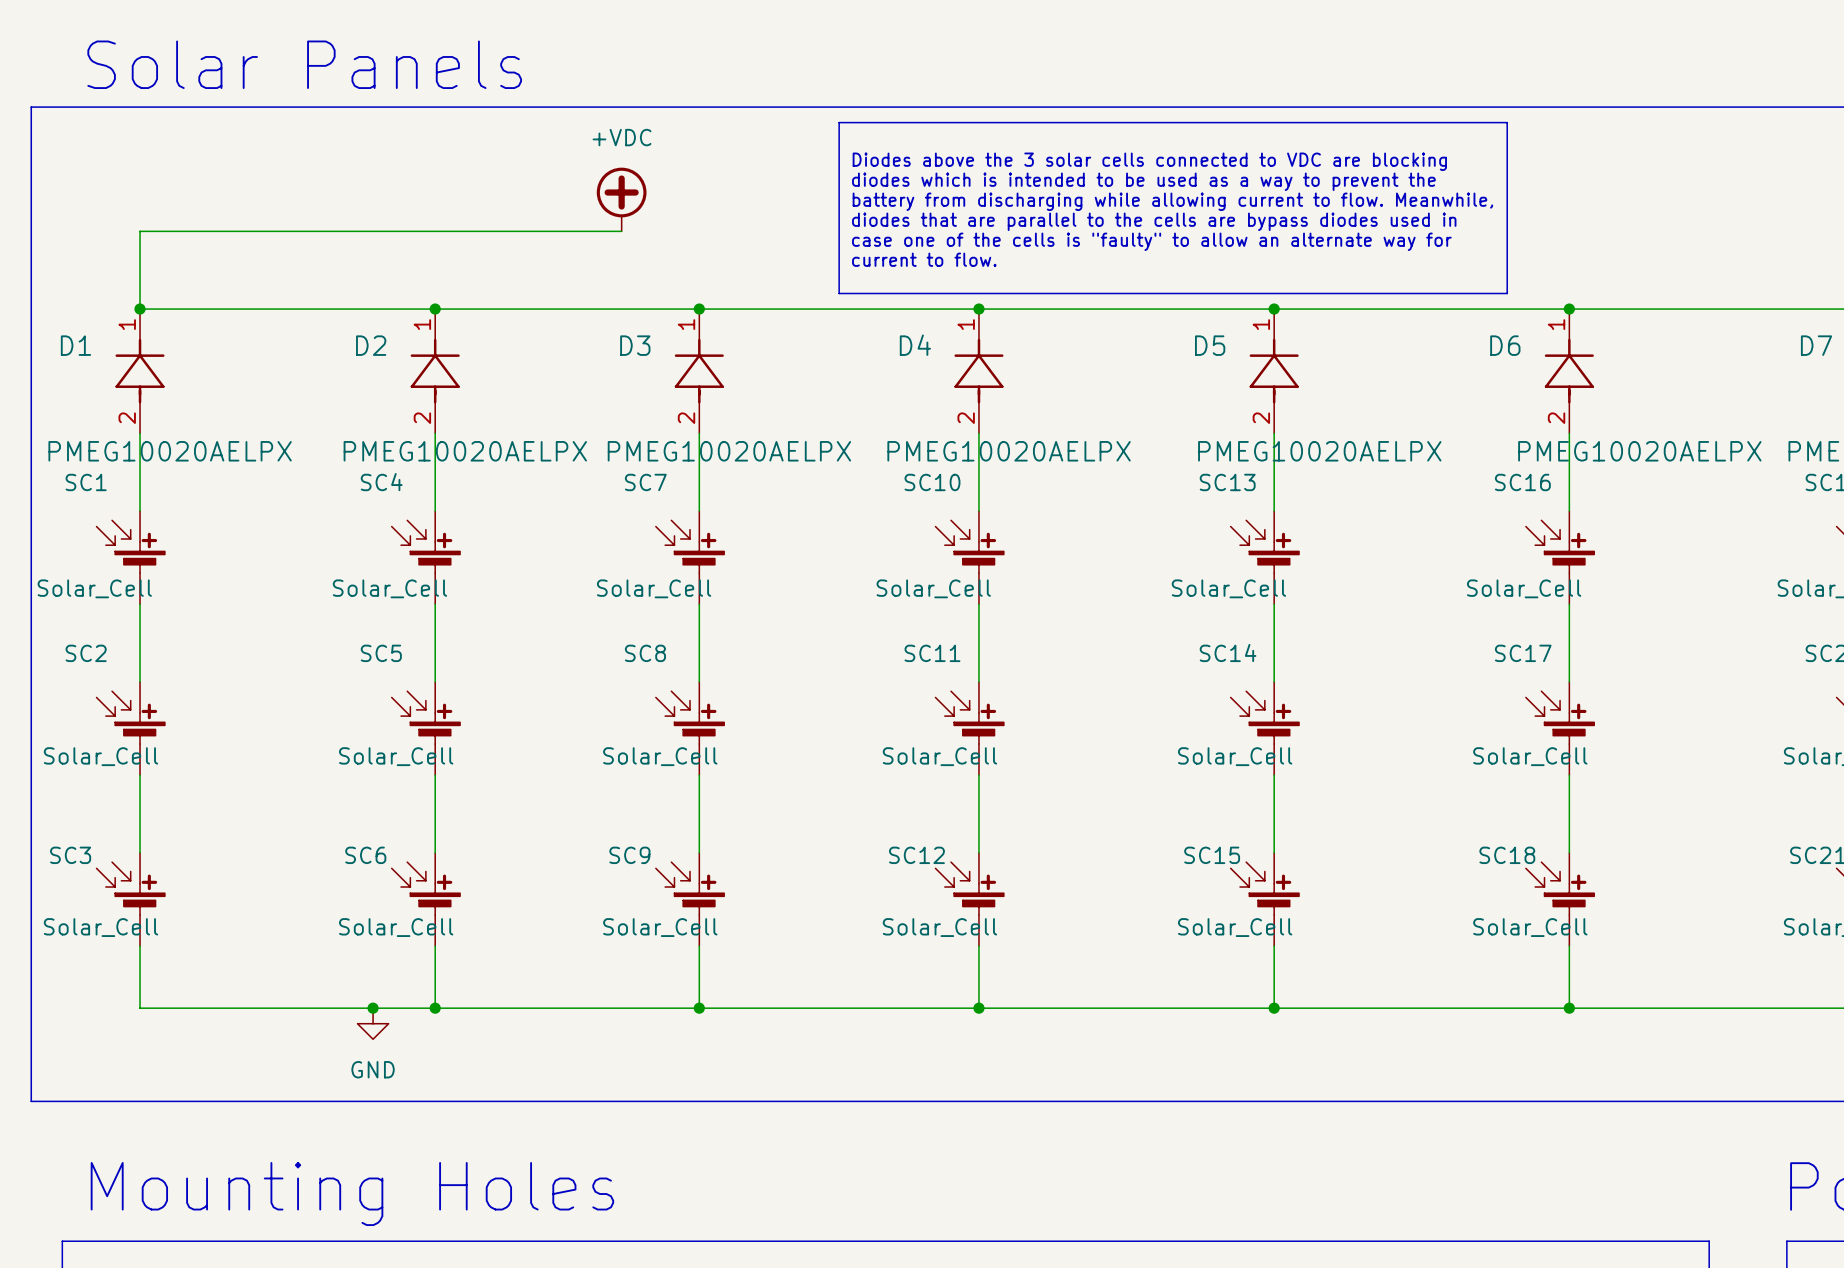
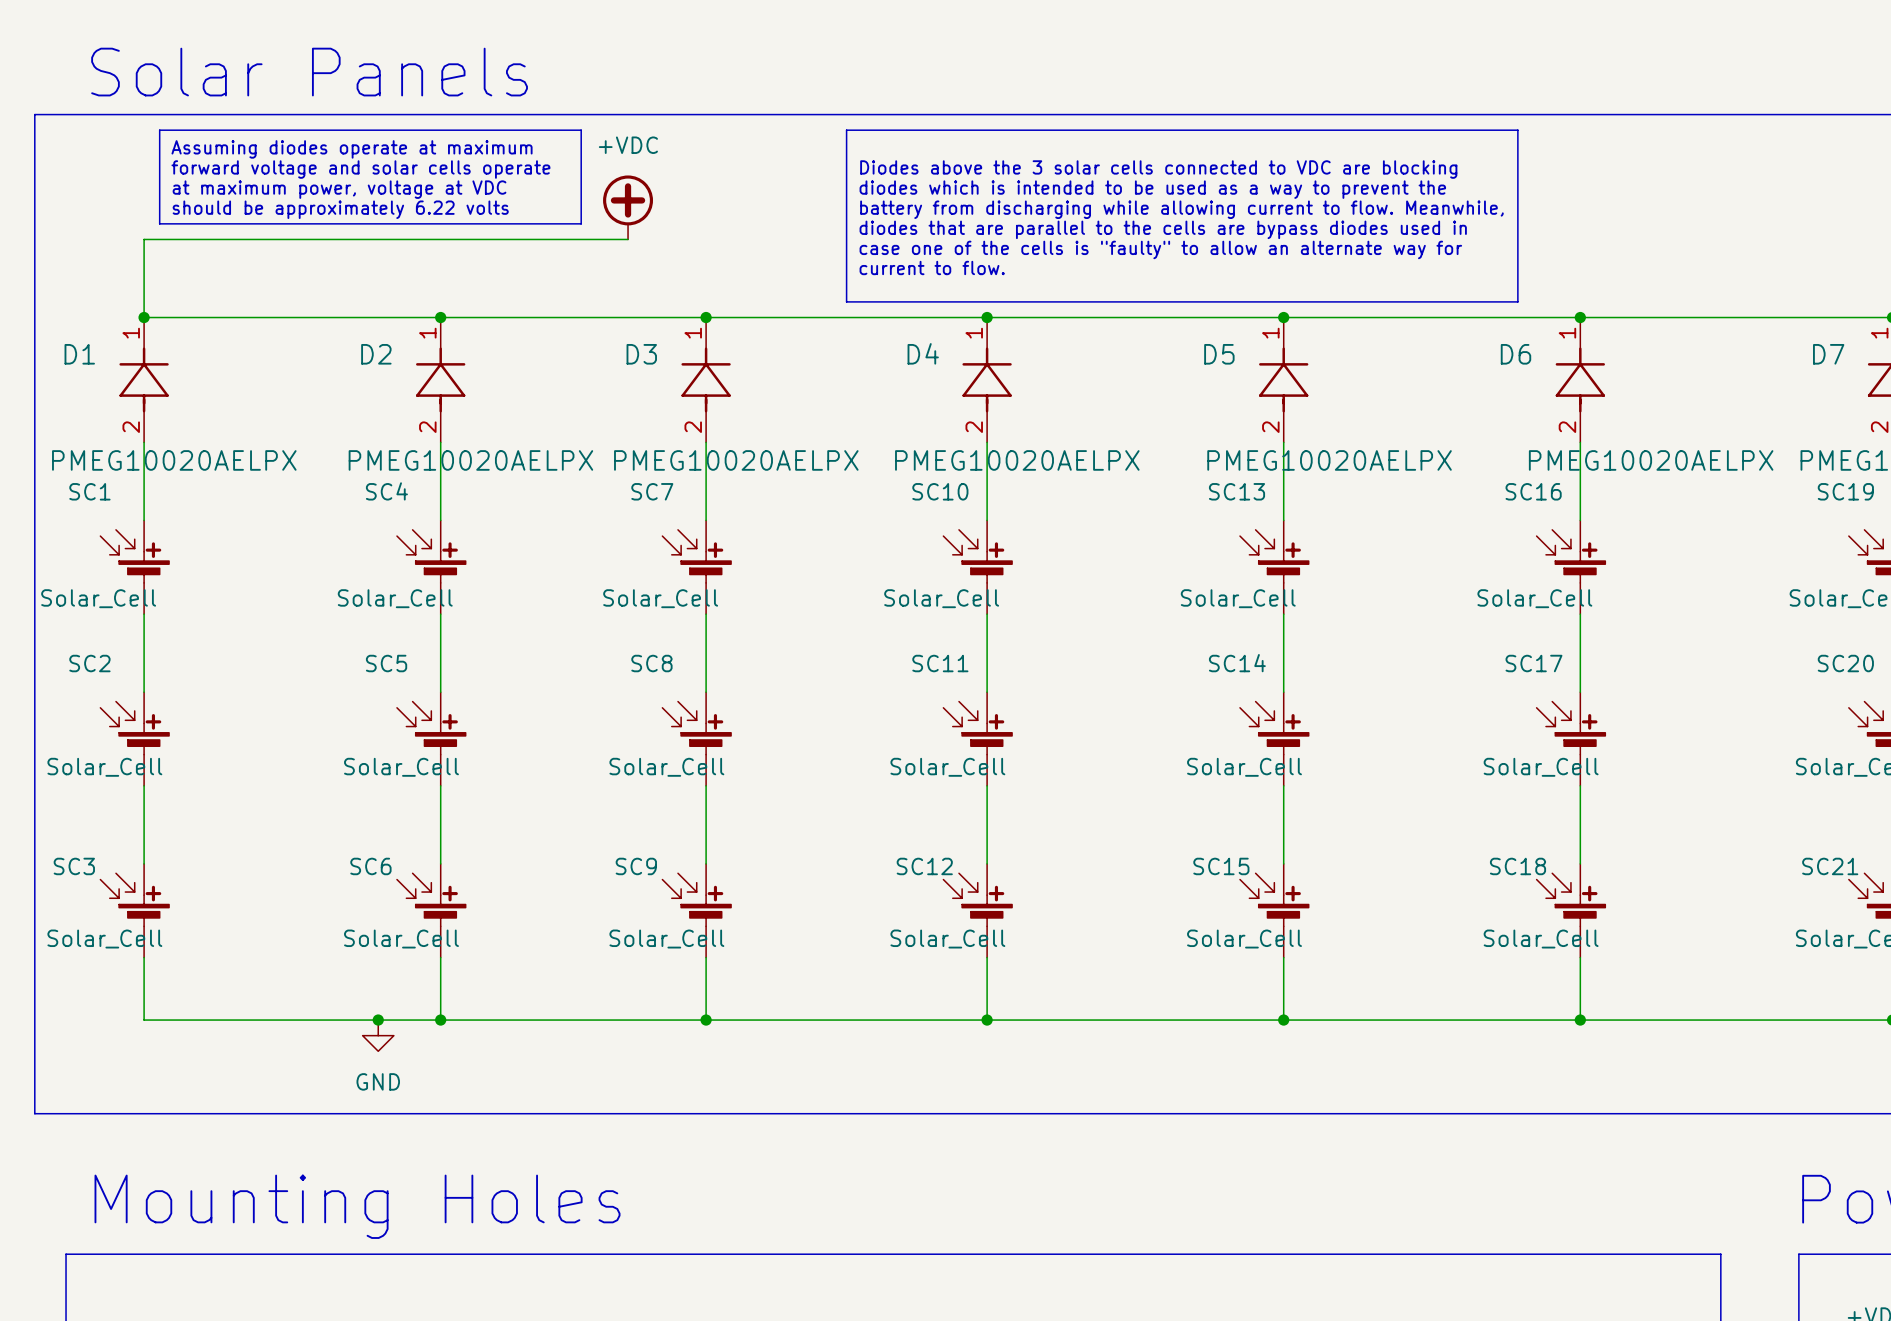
line: none -> (159, 130) (581, 130) (581, 223) (159, 223) (159, 130)
text: none -> Assuming diodes operate at maximum (352, 149)
text: none -> forward voltage and solar cells operate (360, 169)
text: none -> at maximum power, voltage at VDC (339, 189)
text: none -> should be approximately 6.22 volts (340, 209)

